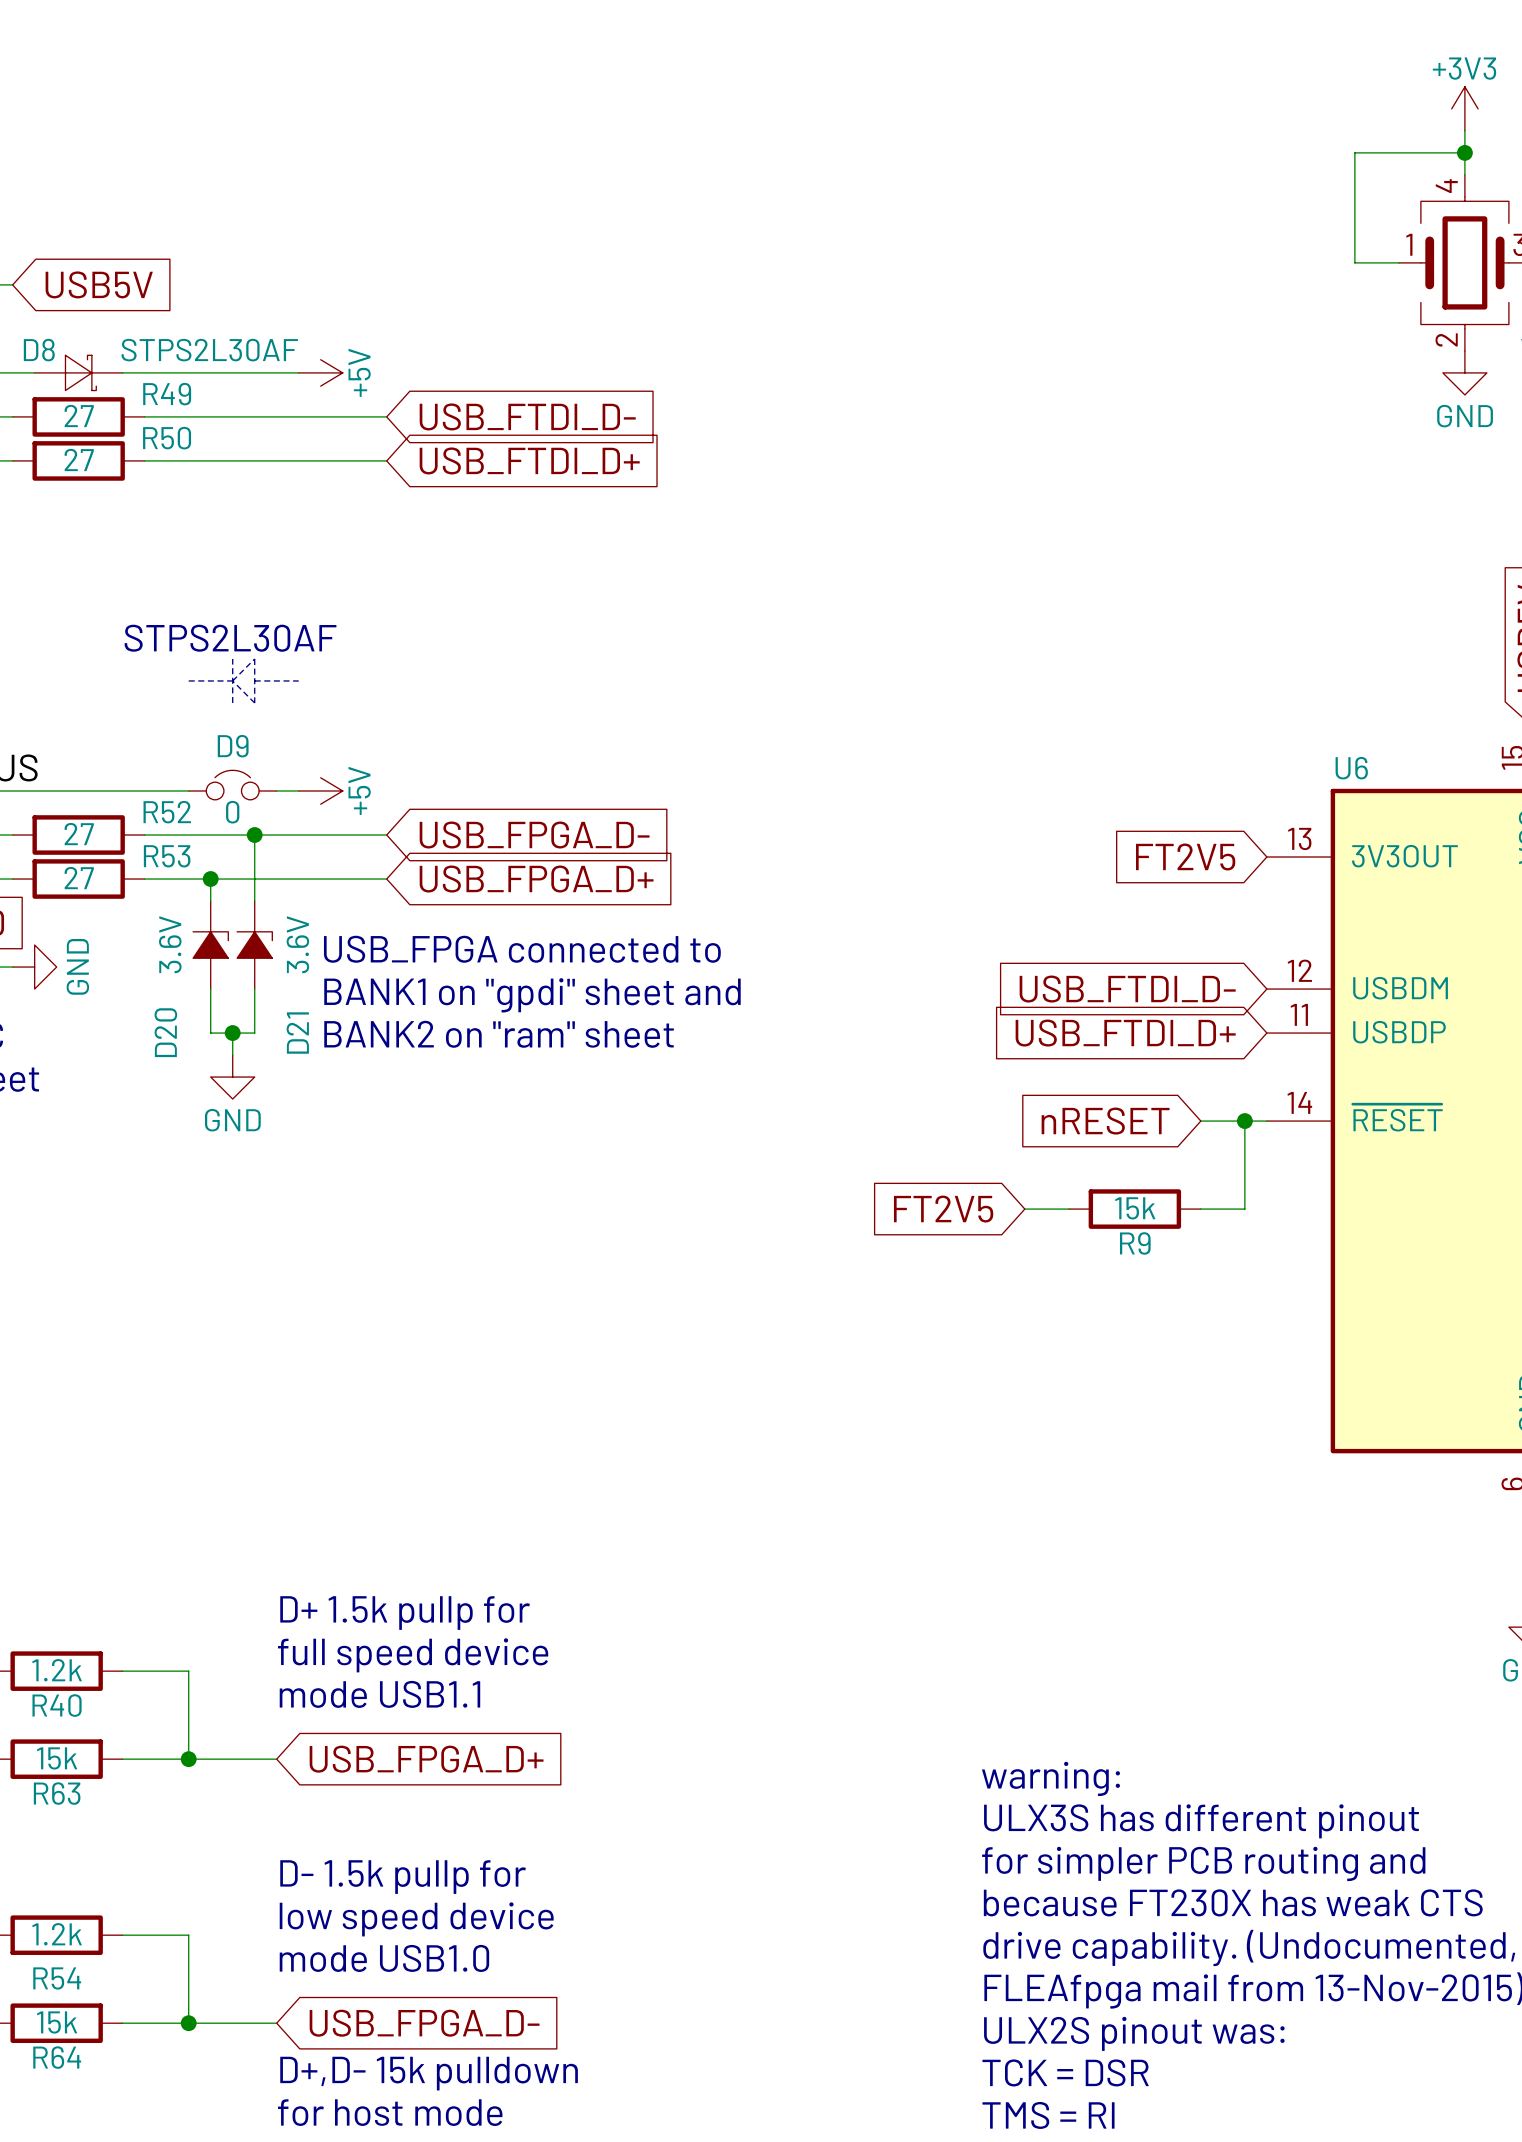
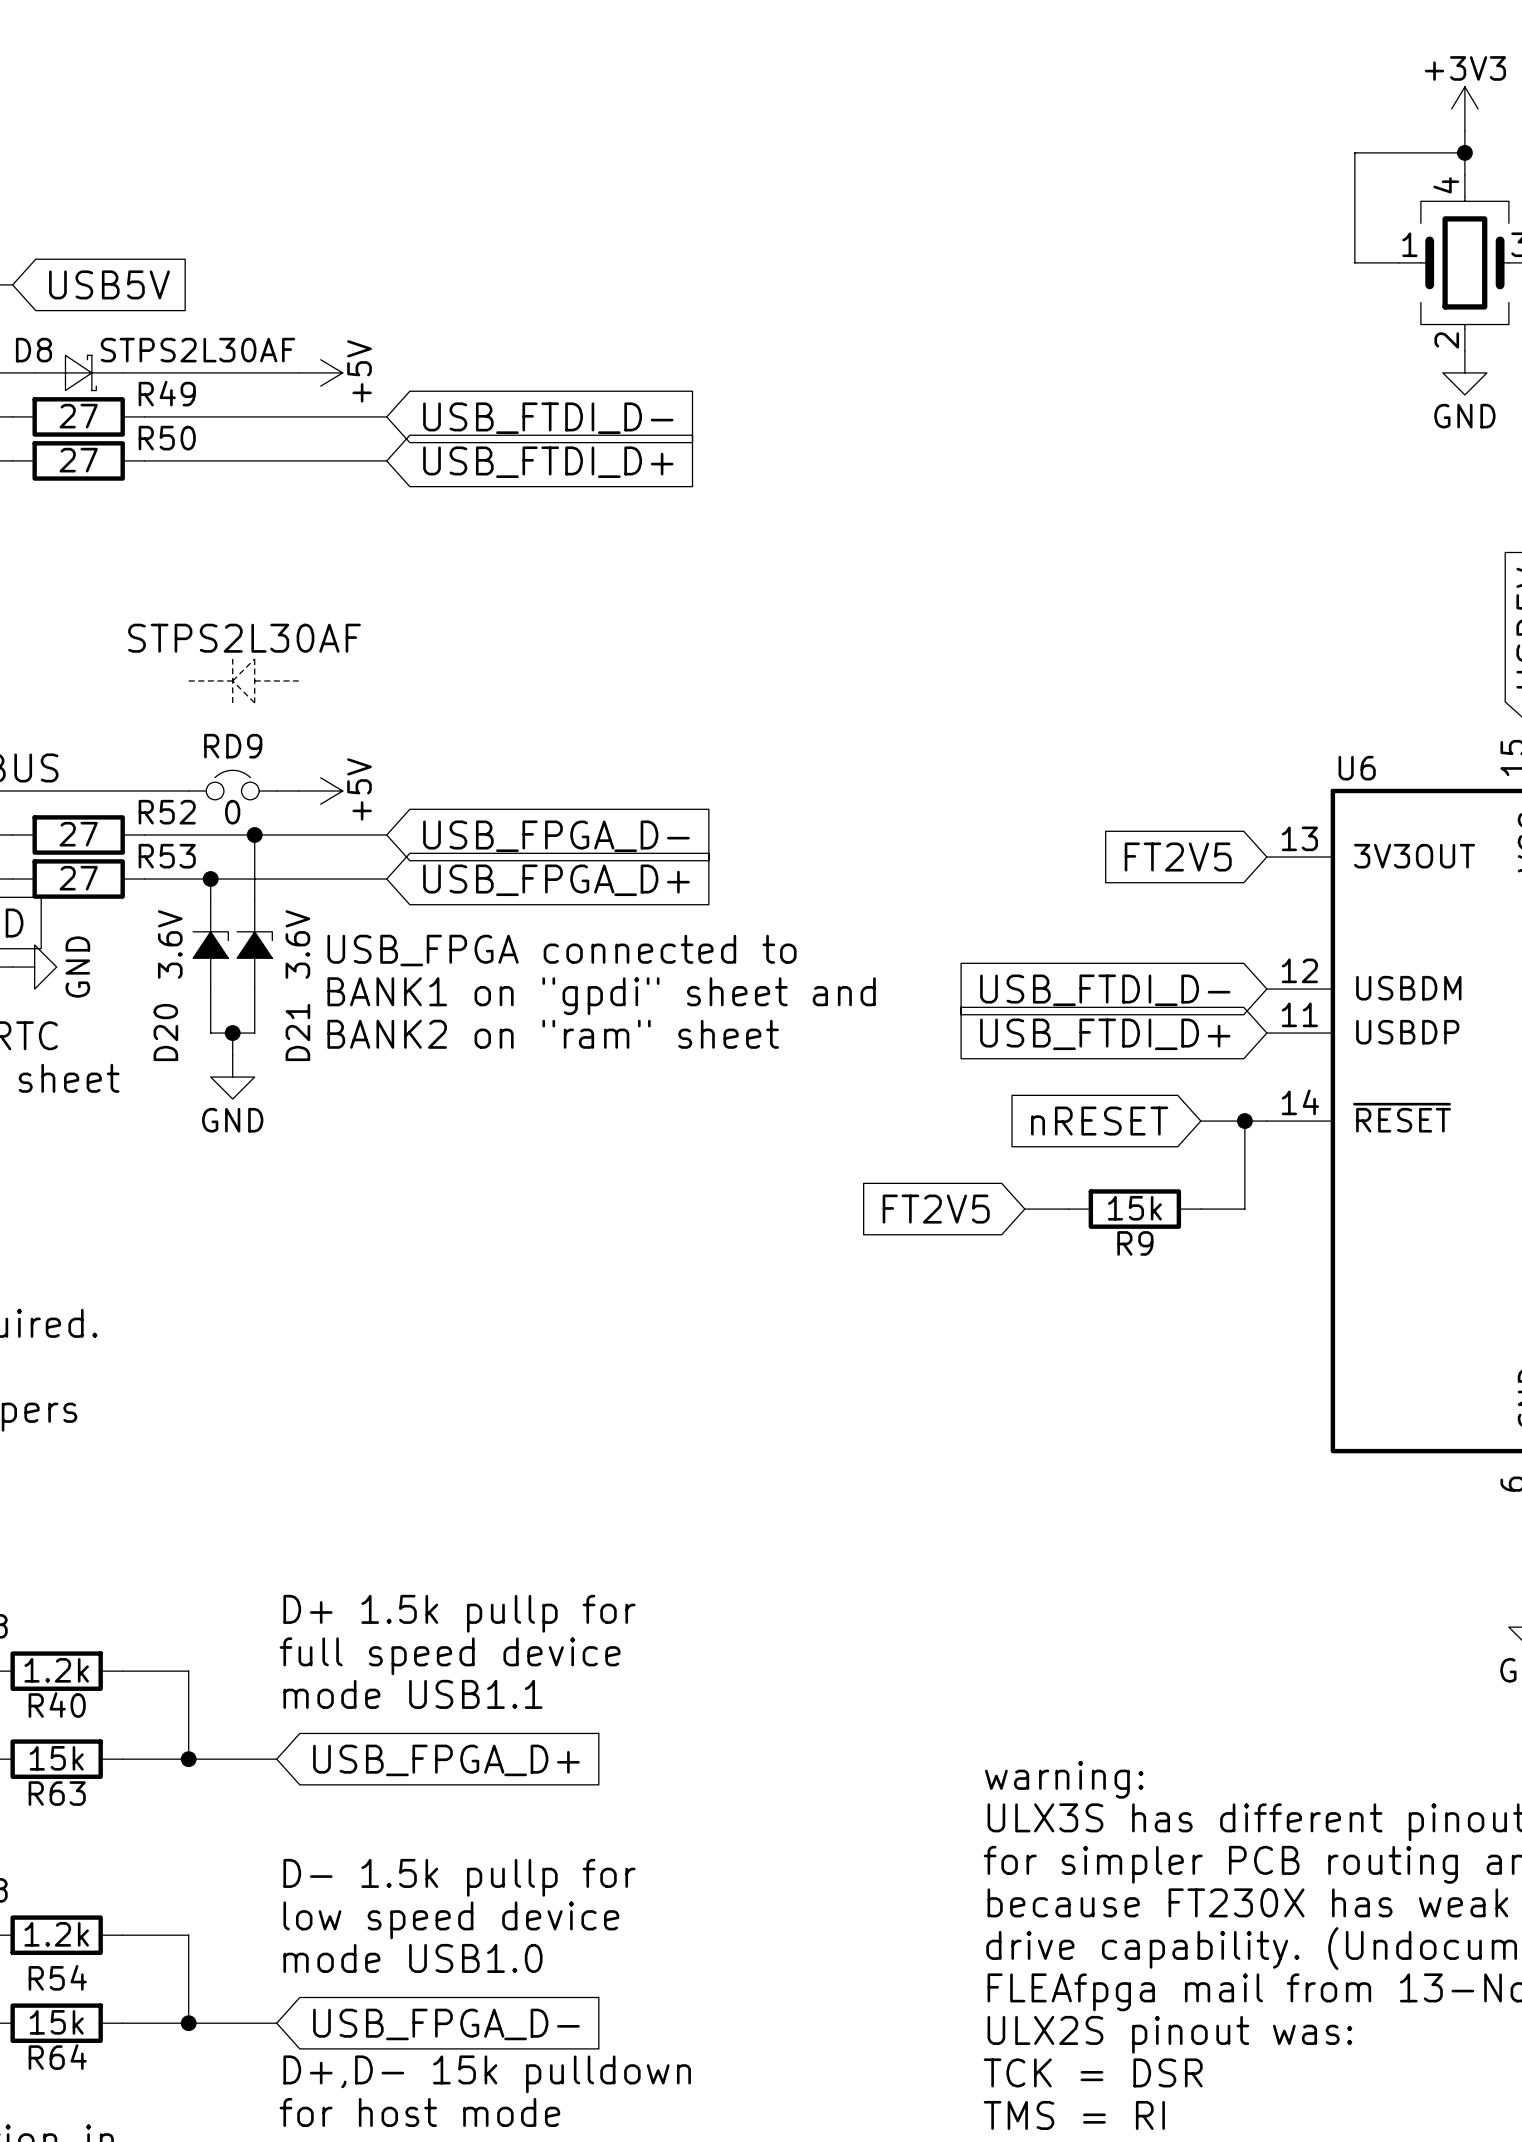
D9 name: D9 (233, 746) -> RD9 (233, 746)

